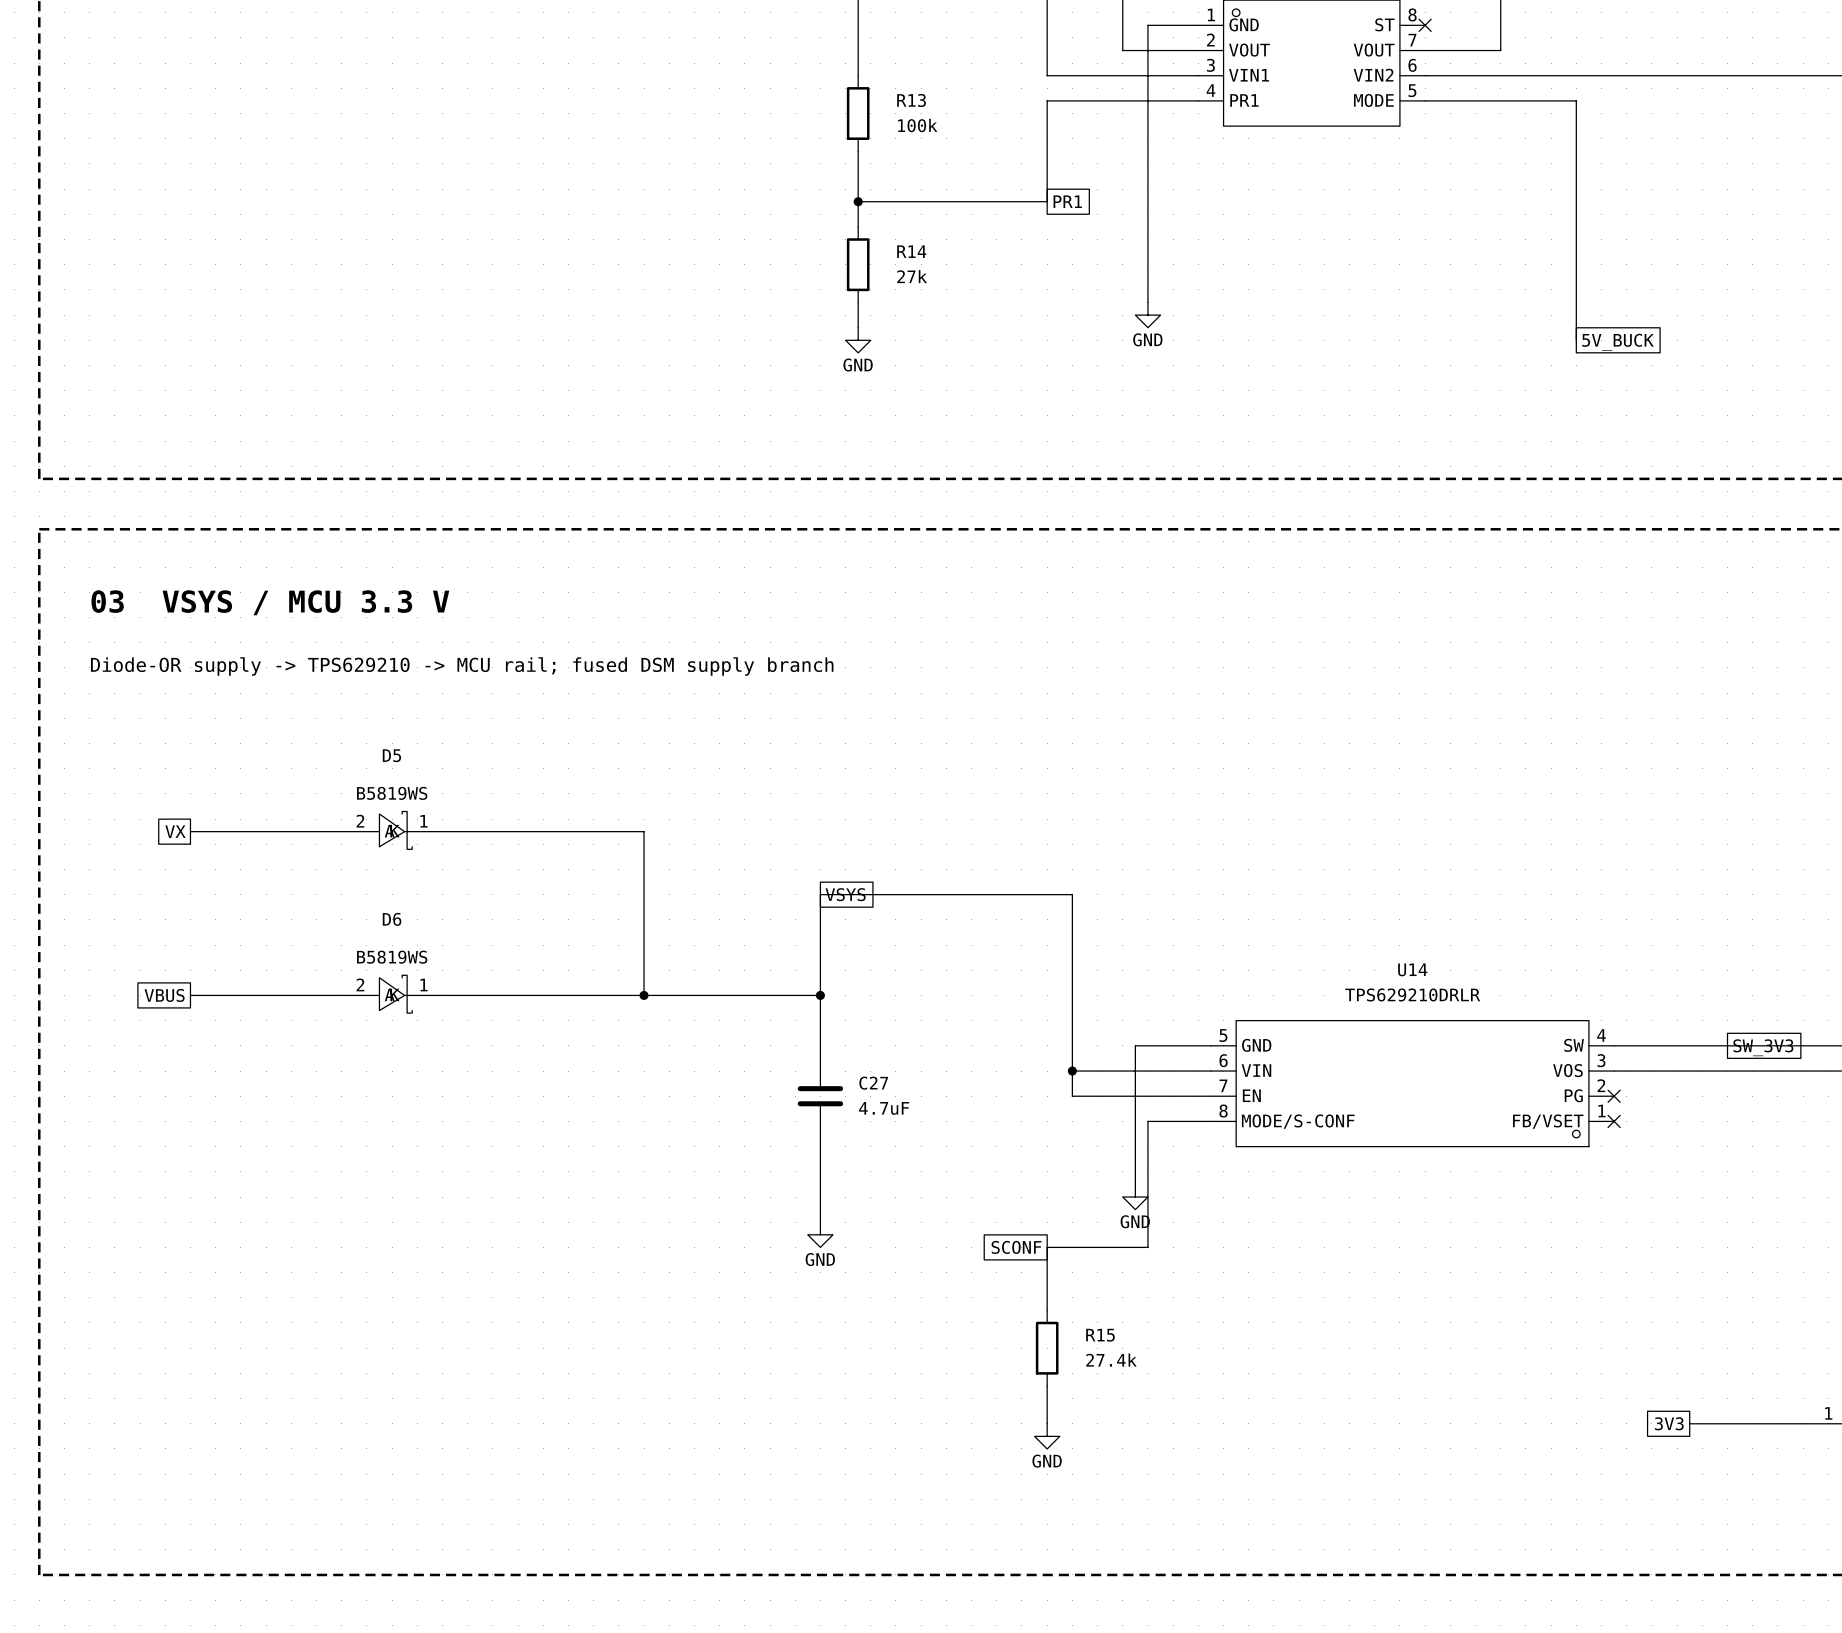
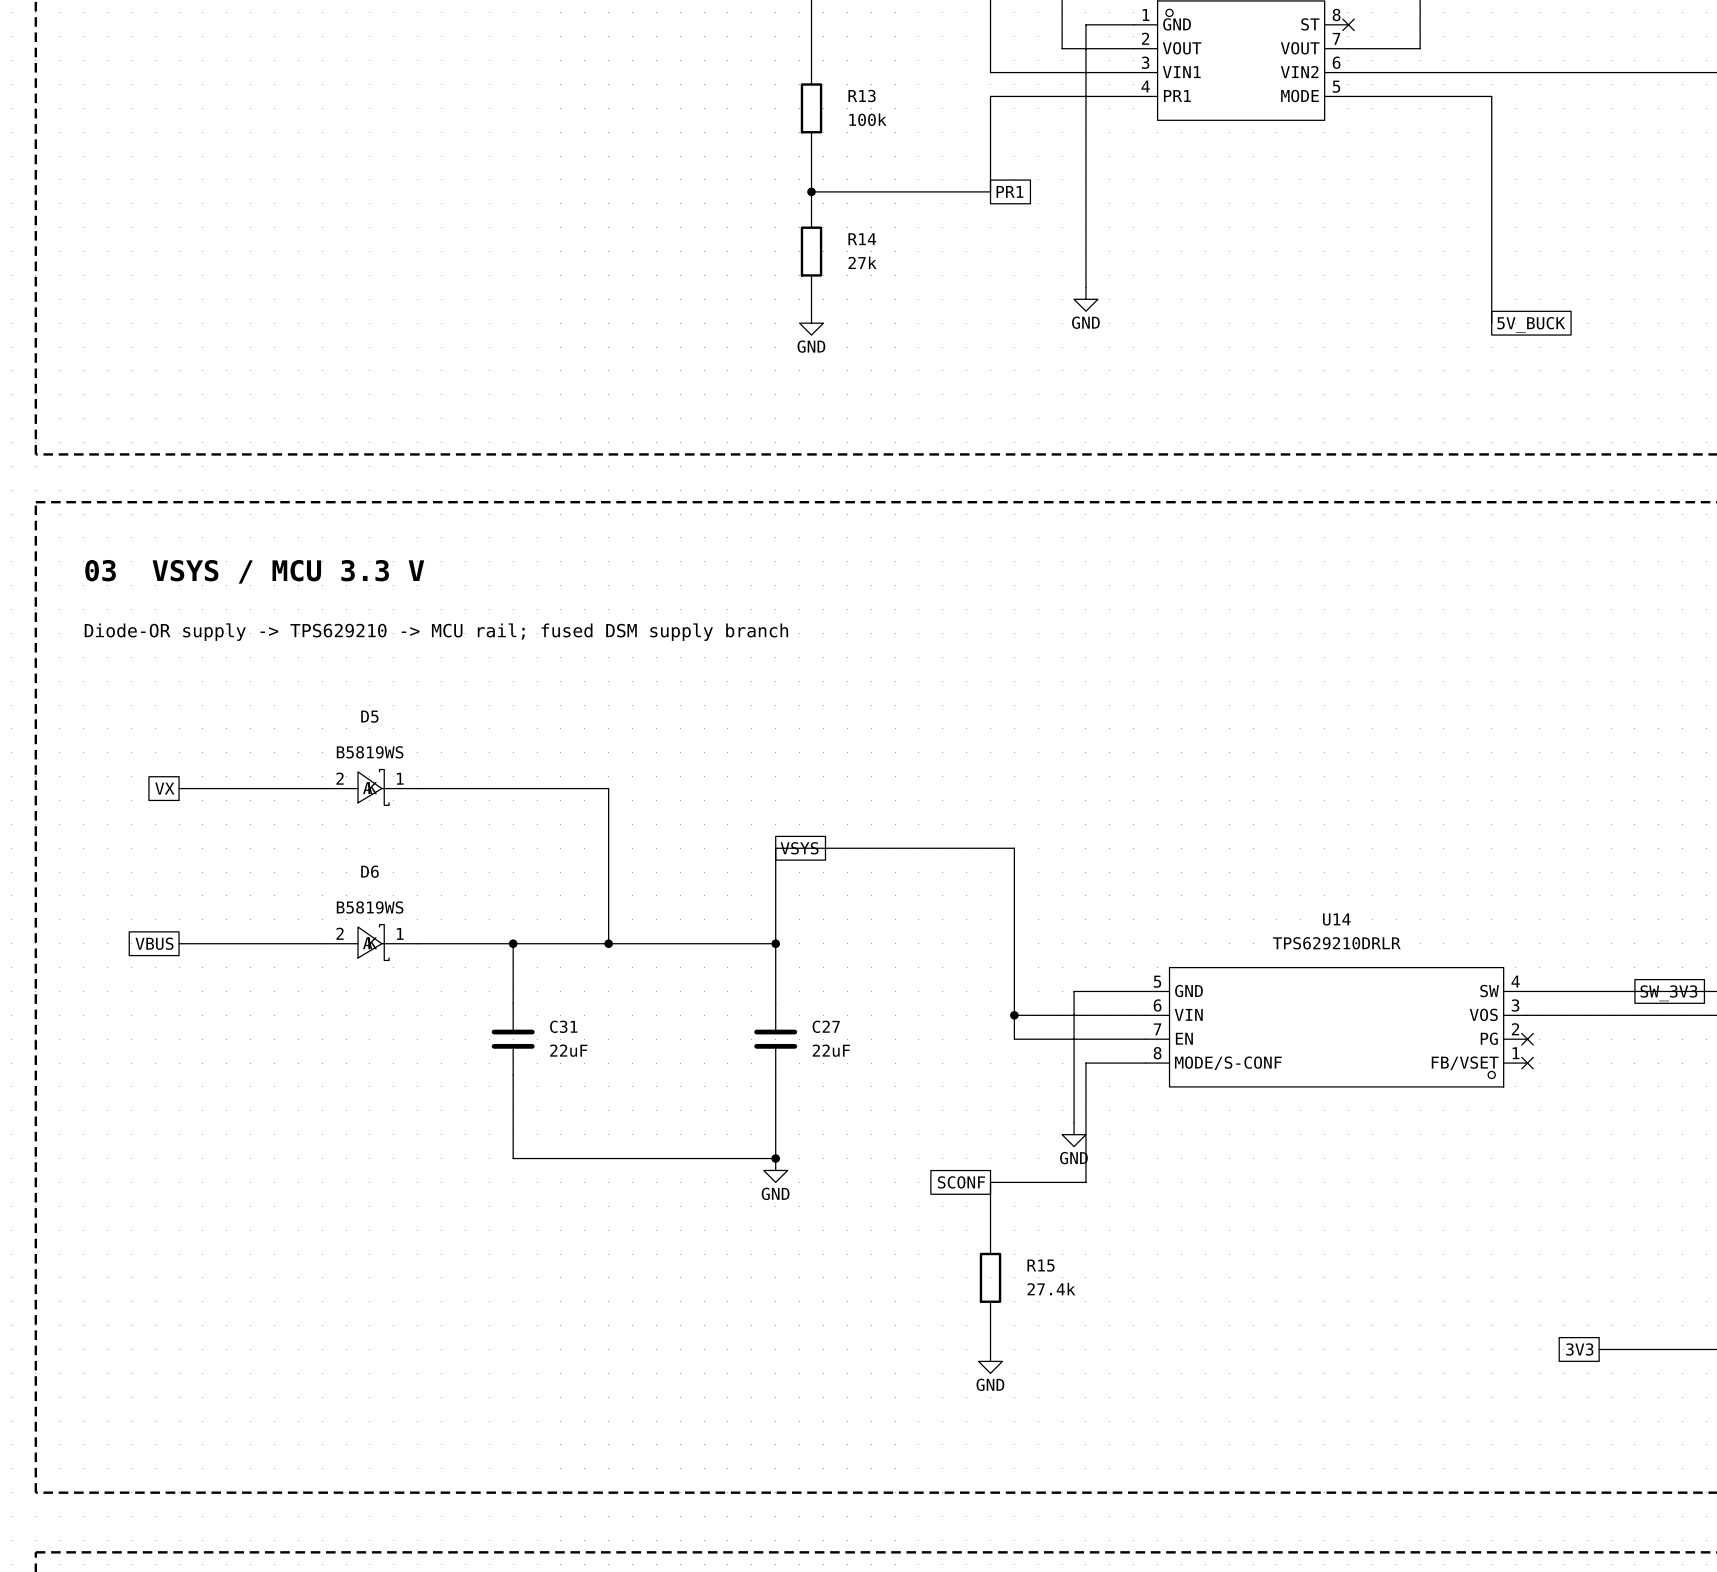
wire: none -> (513, 943) (513, 1003)
junction: none -> (513, 943)
C31: none -> 22uF (513, 1039)
C27 value: 4.7uF (884, 1108) -> 22uF (831, 1050)
wire: none -> (513, 1074) (513, 1158) (775, 1158)
junction: none -> (775, 1158)

